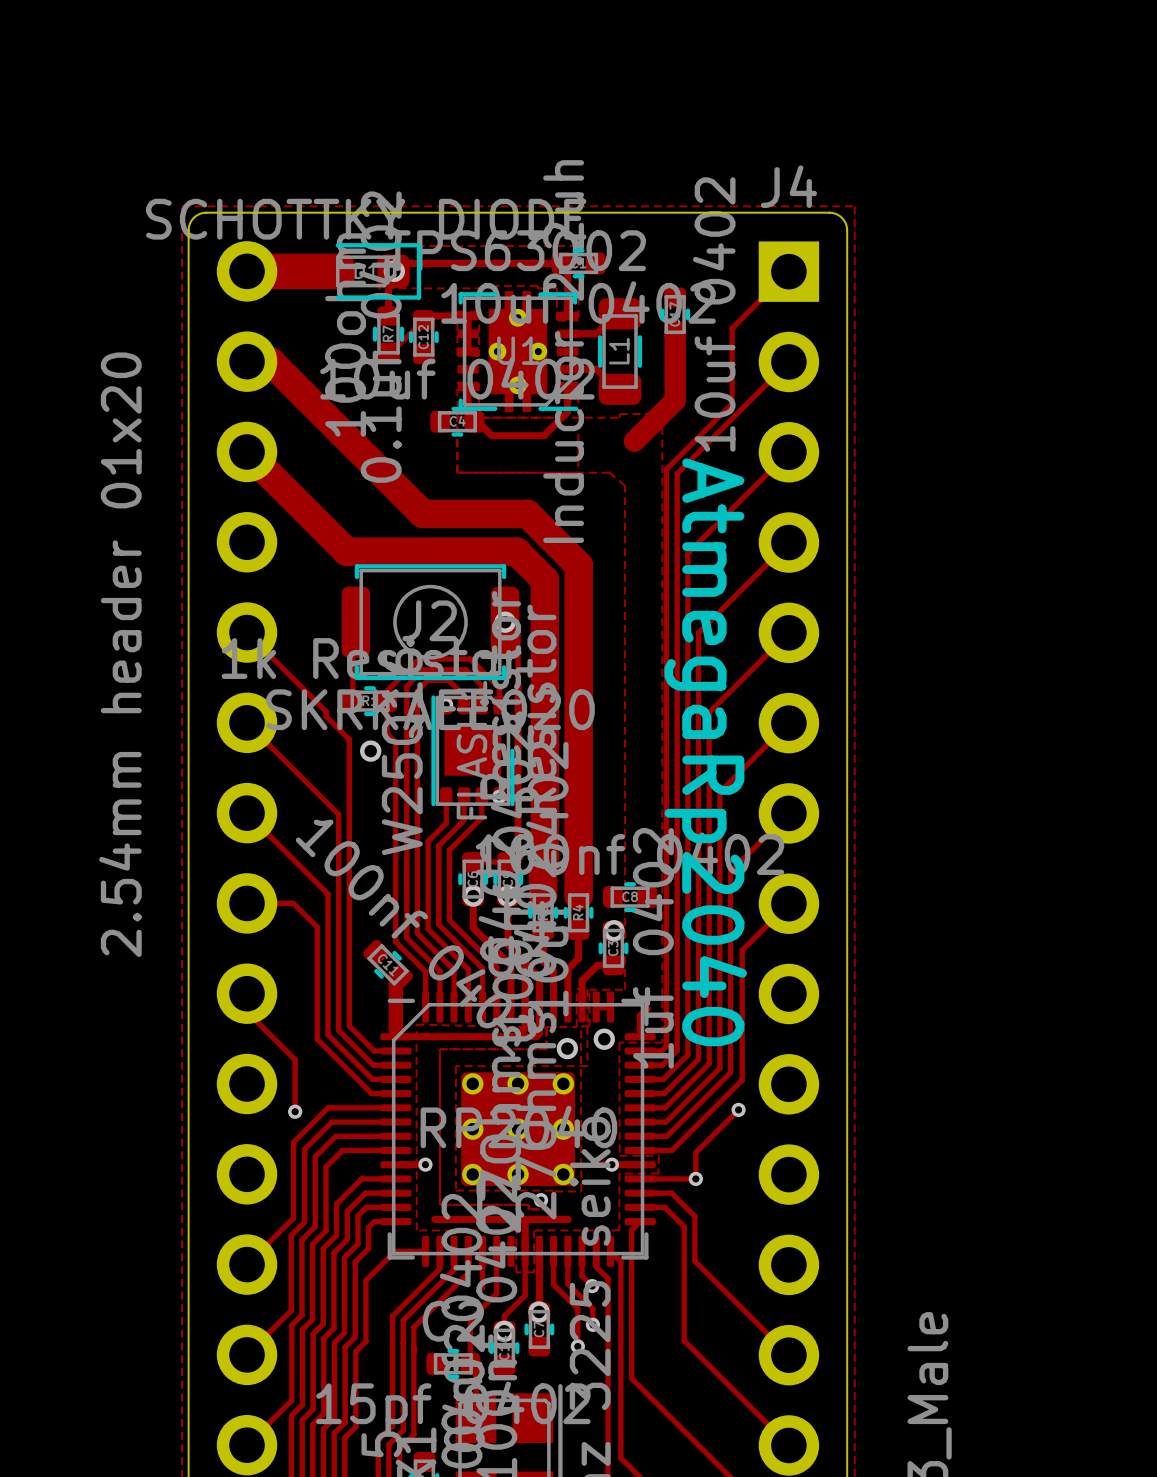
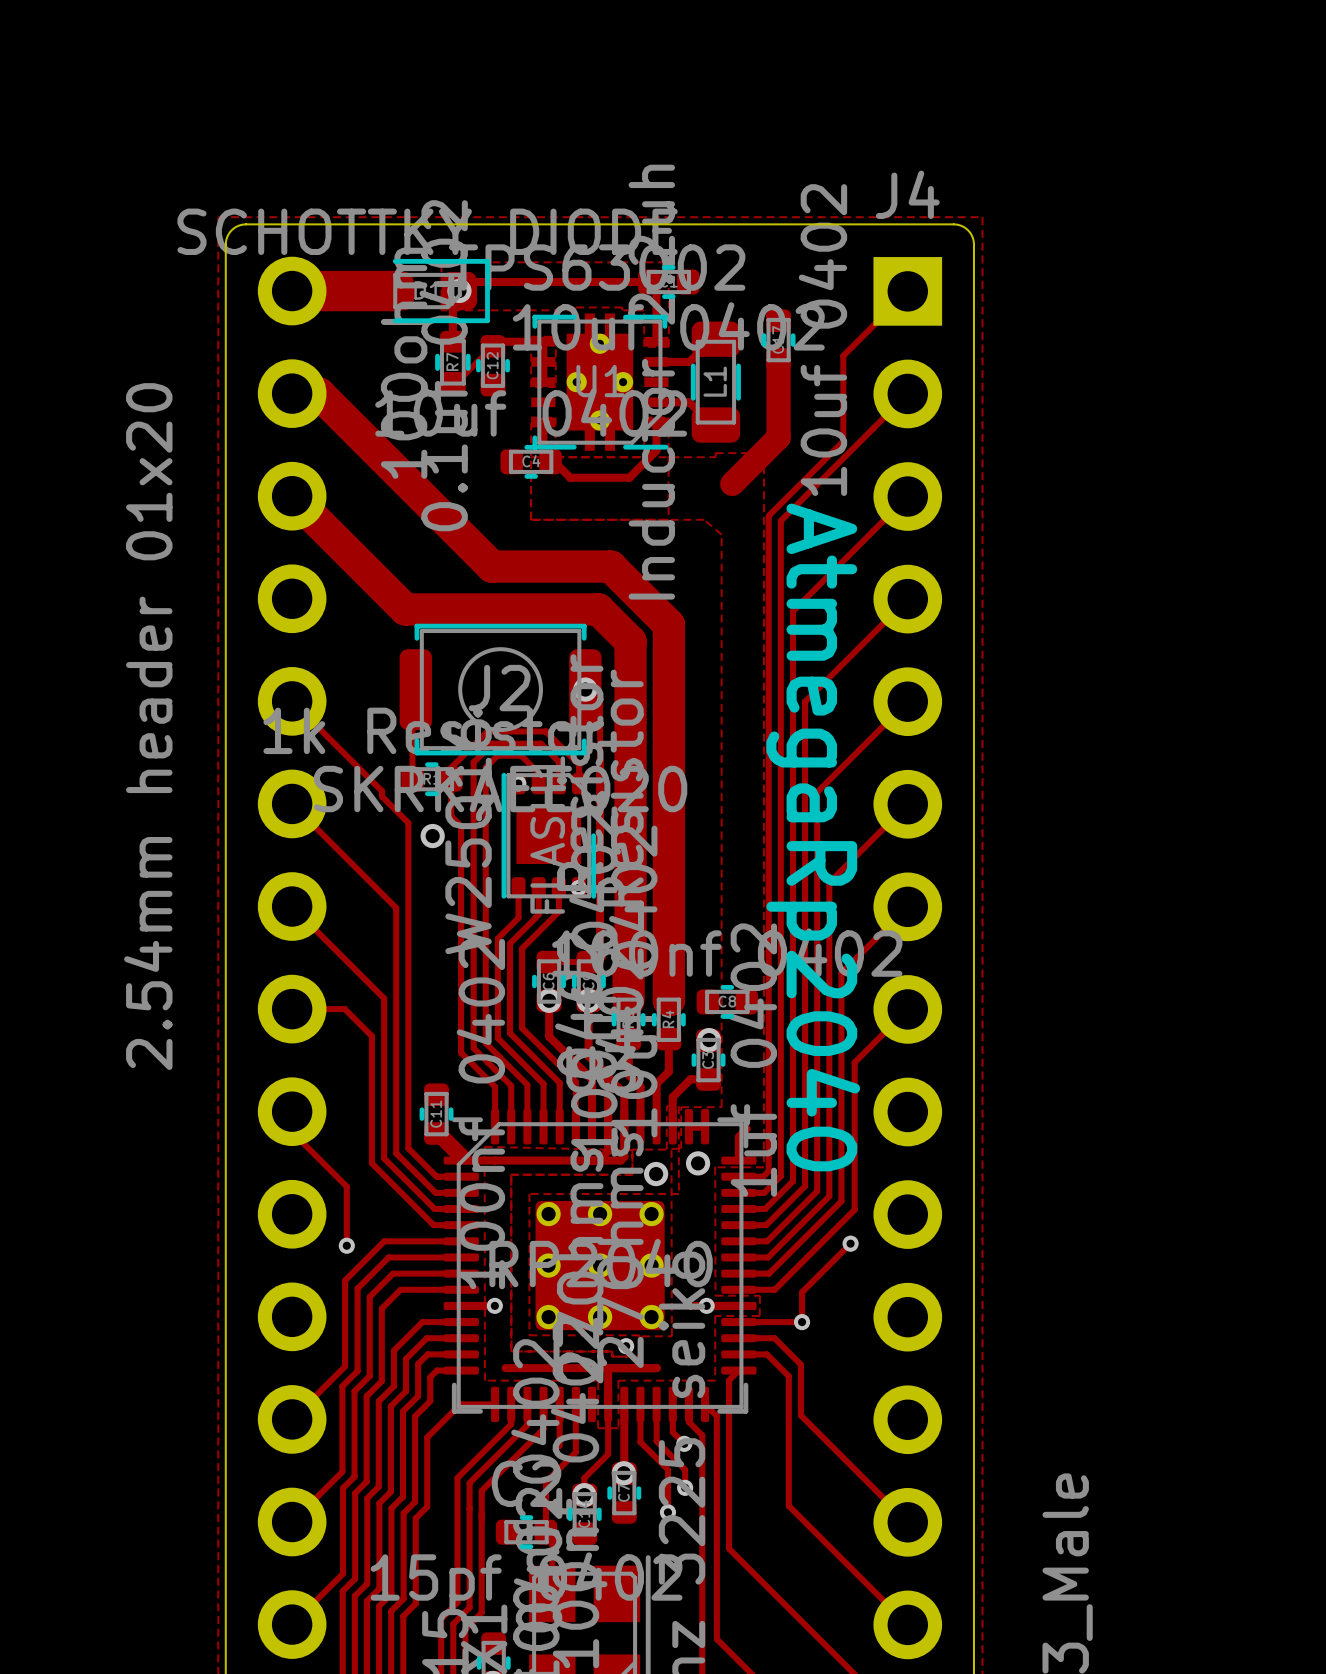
C11 rotation: 0° (388, 964) -> 45° clockwise (436, 1114)
C11 position: (388, 964) -> (436, 1114)
track: (395, 978) (395, 1033) -> (436, 1133) (461, 1156)

